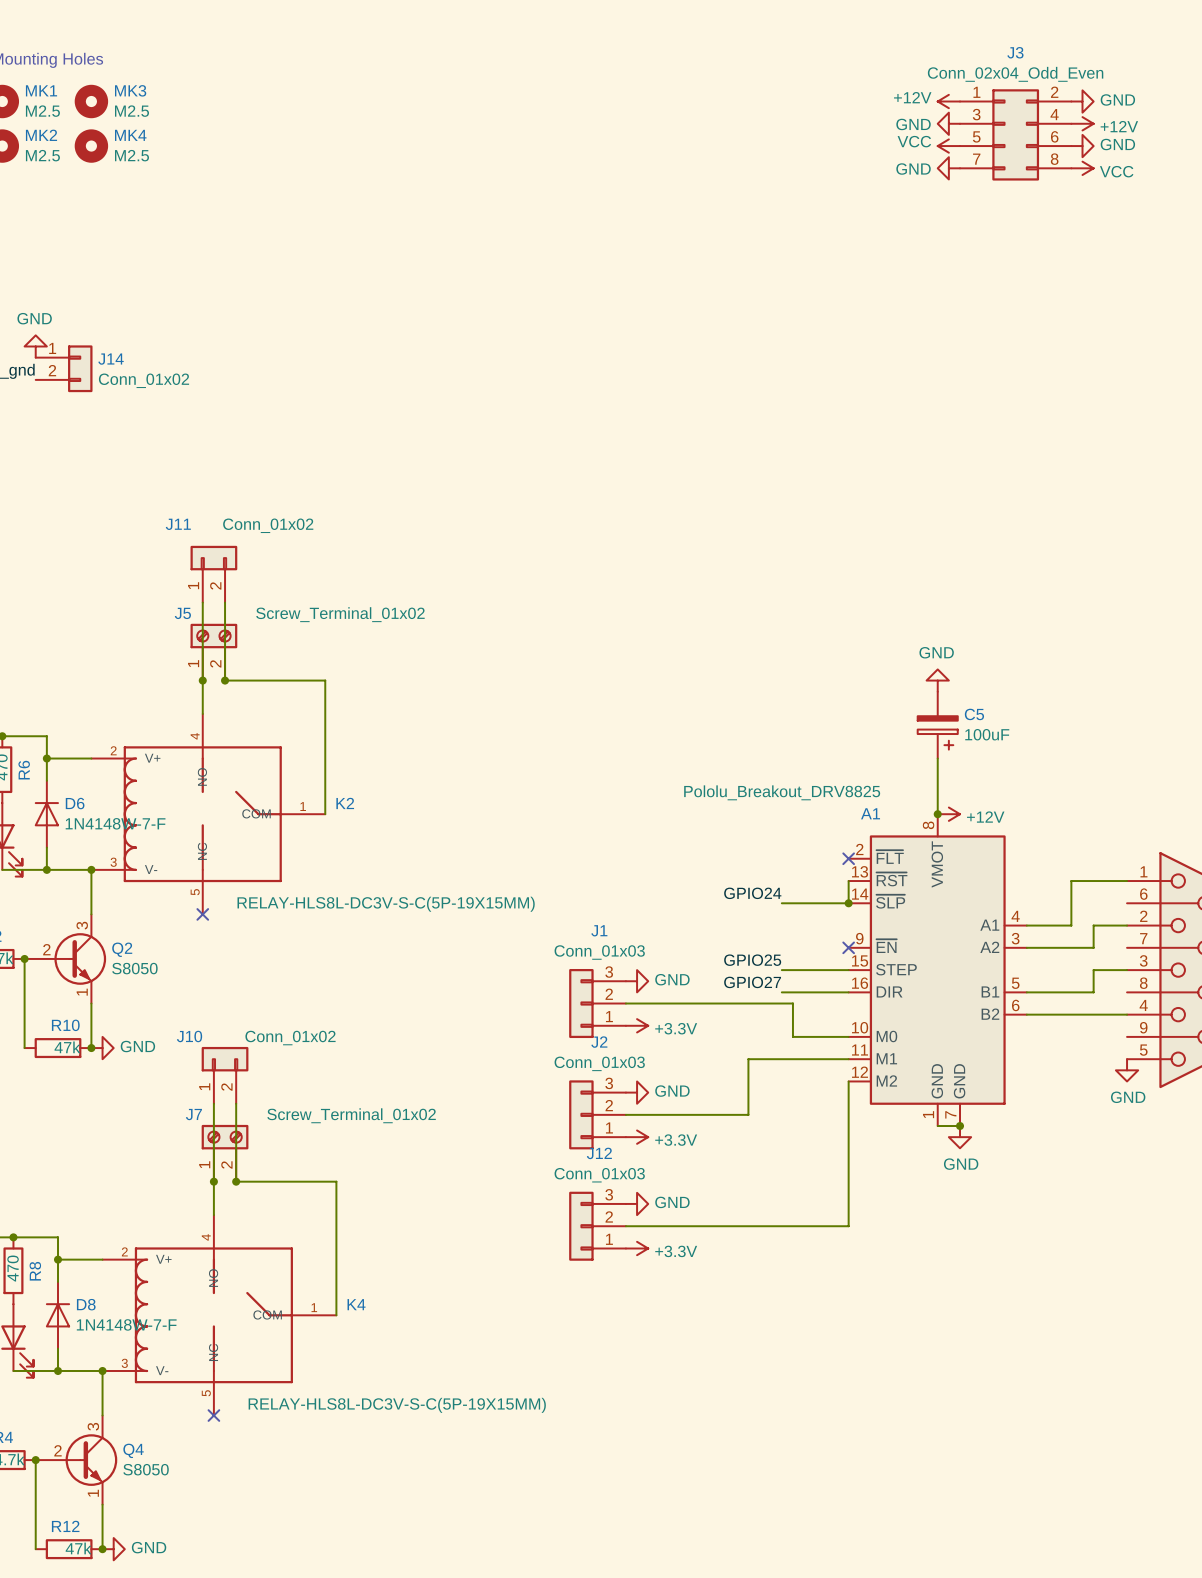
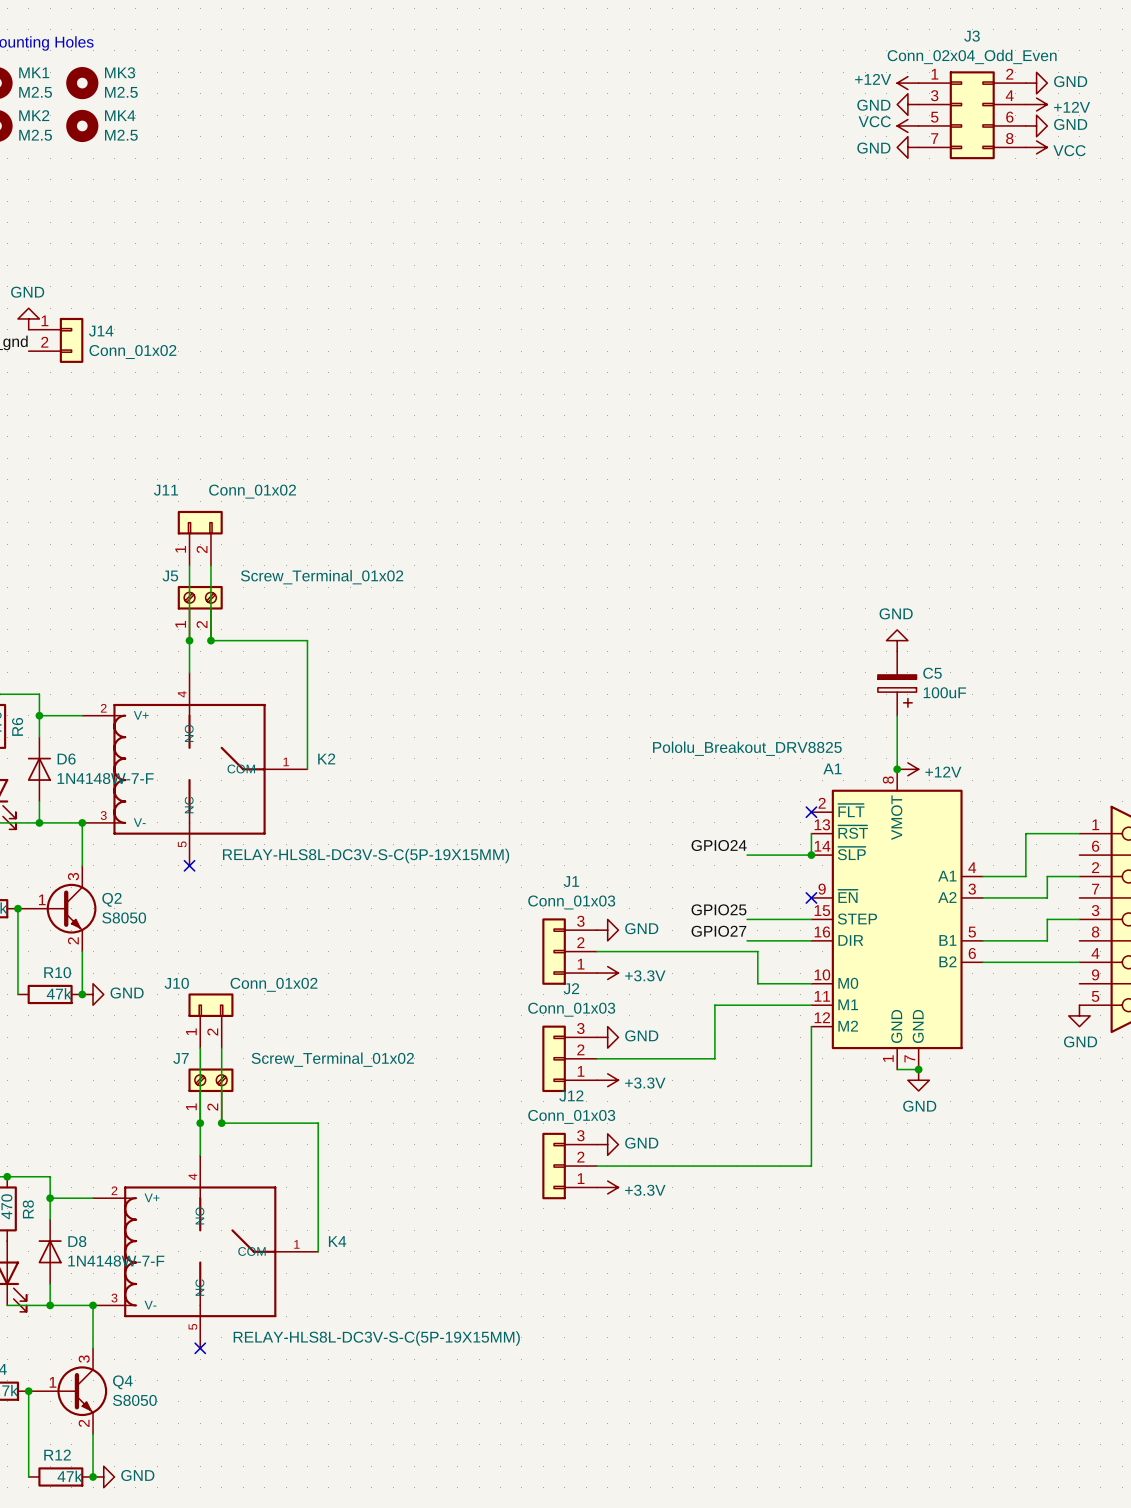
Q2 symbol: [24, 914, 107, 1004] -> [17, 865, 97, 952]
Q4 symbol: [35, 1415, 118, 1505] -> [28, 1348, 108, 1435]

